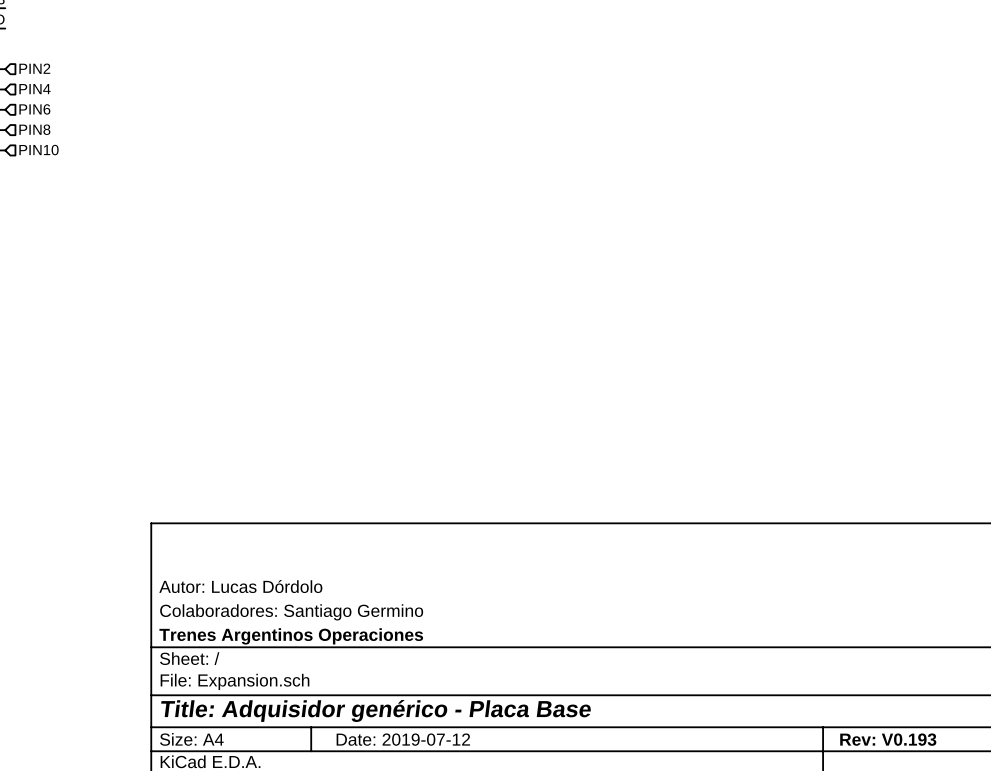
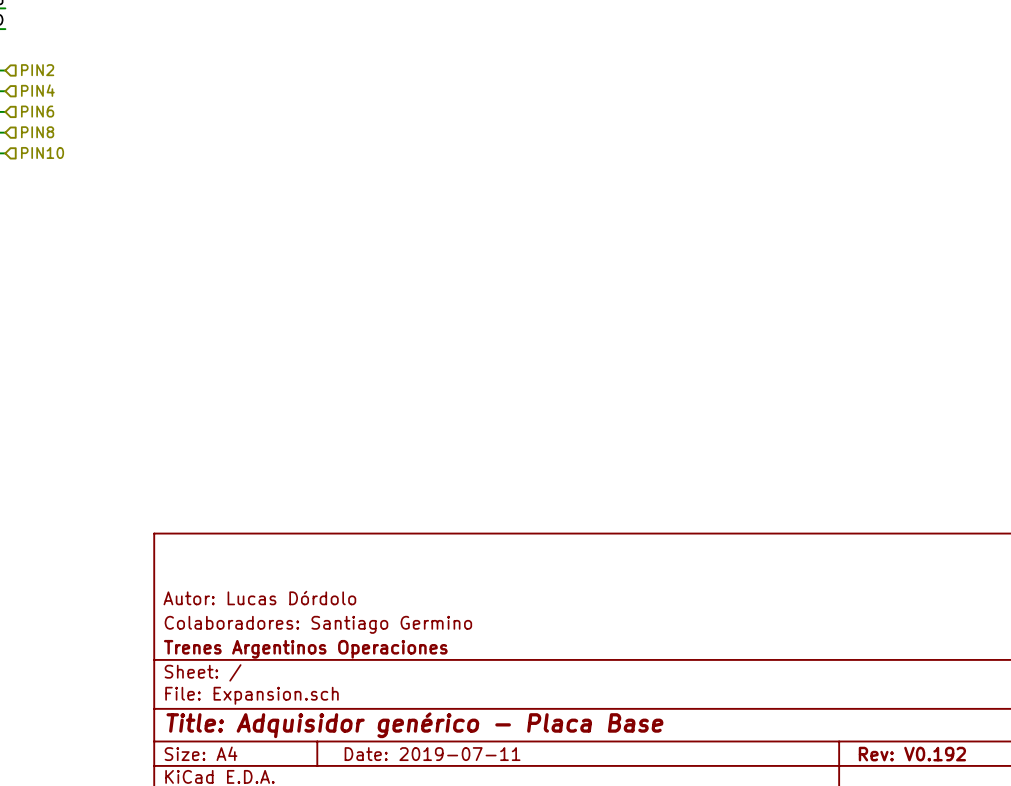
title block: Date: 2019-07-12 (403, 739) -> Date: 2019-07-11 (432, 754)
title block: Rev: V0.193 (888, 739) -> Rev: V0.192 (912, 754)

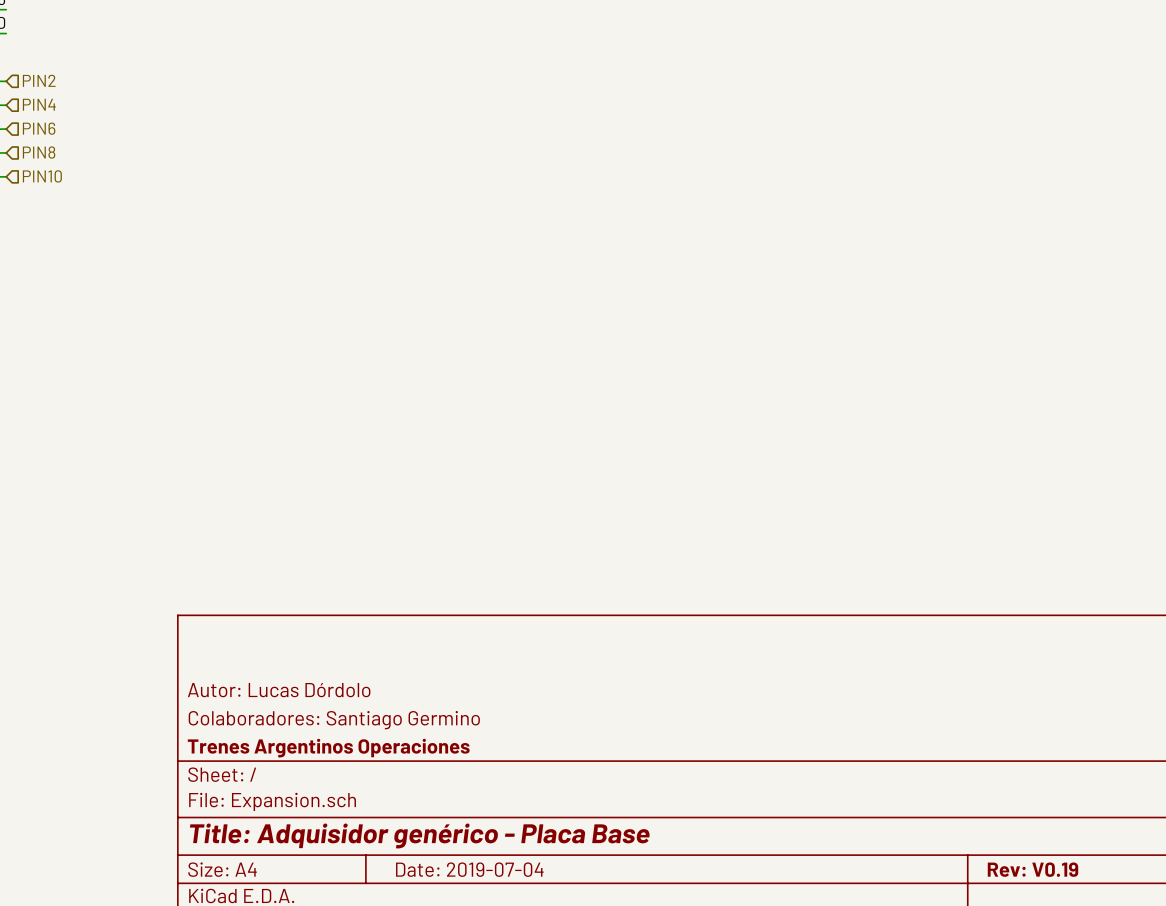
title block: Date: 2019-07-11 (432, 754) -> Date: 2019-07-04 (469, 869)
title block: Rev: V0.192 (912, 754) -> Rev: V0.19 (1032, 869)

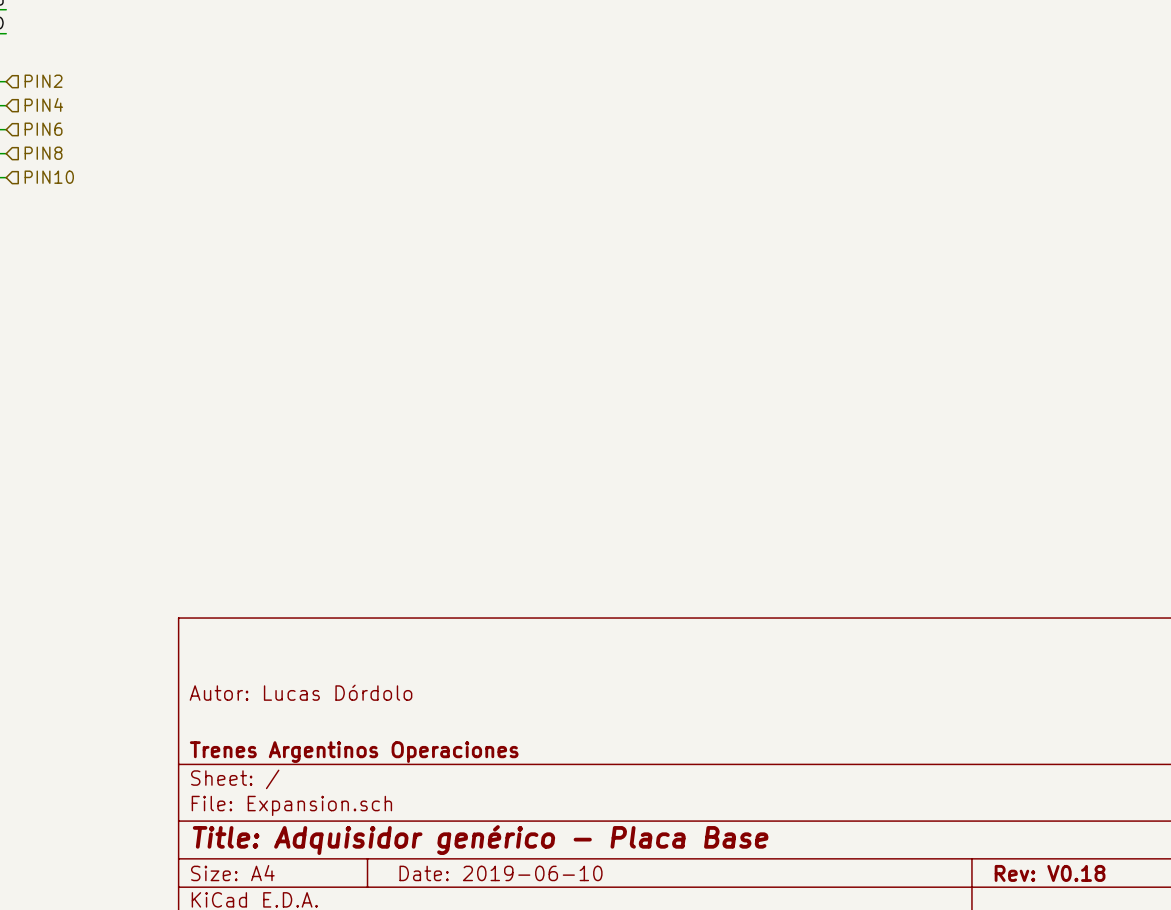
title block: Colaboradores: Santiago Germino (334, 720) -> none
title block: Date: 2019-07-04 (469, 869) -> Date: 2019-06-10 (501, 873)
title block: Rev: V0.19 (1032, 869) -> Rev: V0.18 (1050, 873)

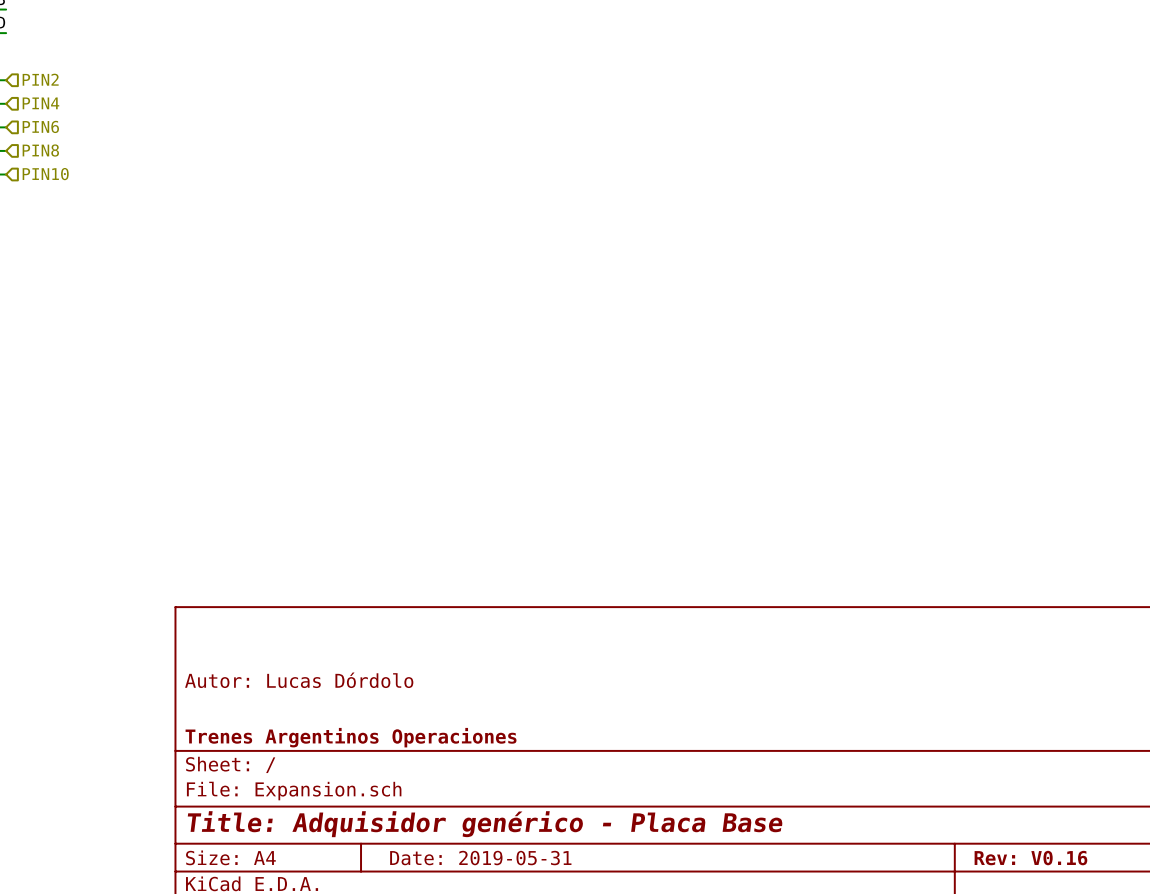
title block: Date: 2019-06-10 (501, 873) -> Date: 2019-05-31 (480, 858)
title block: Rev: V0.18 (1050, 873) -> Rev: V0.16 (1030, 858)

